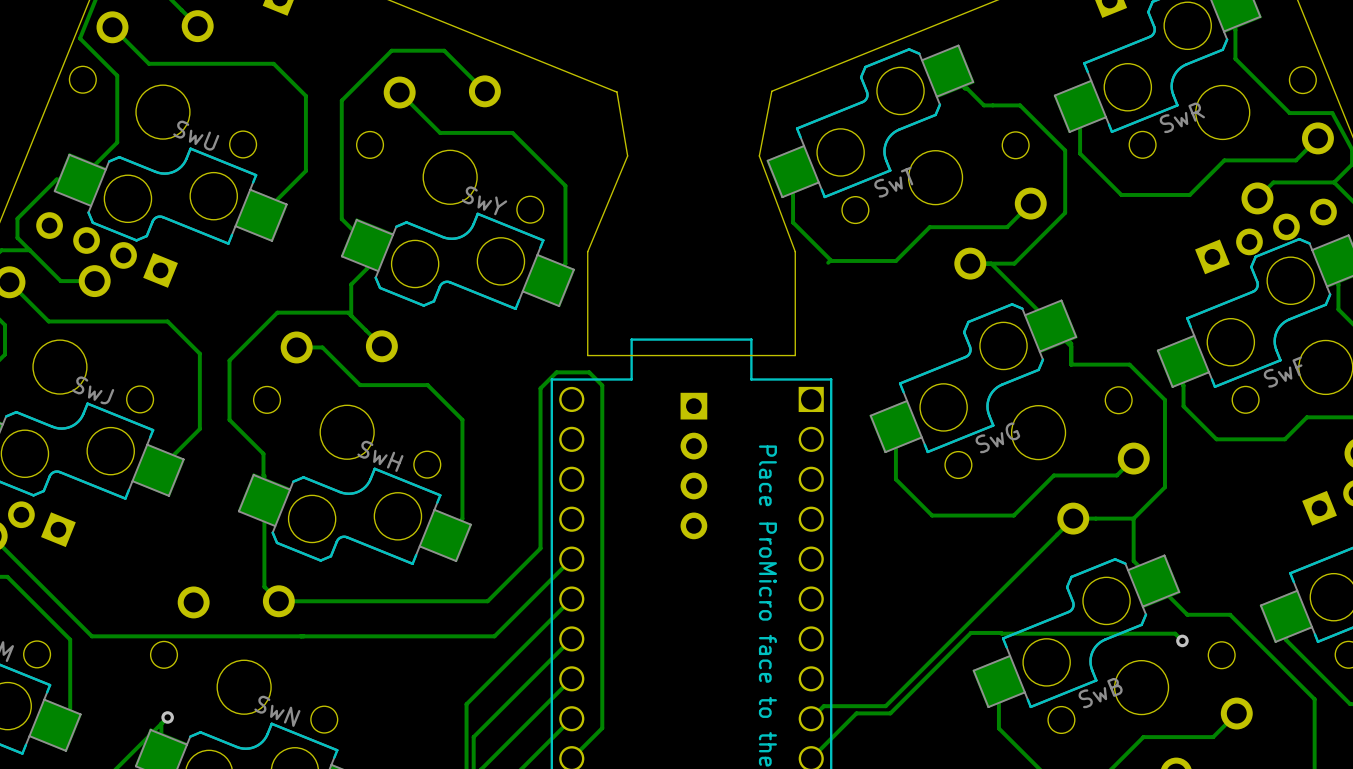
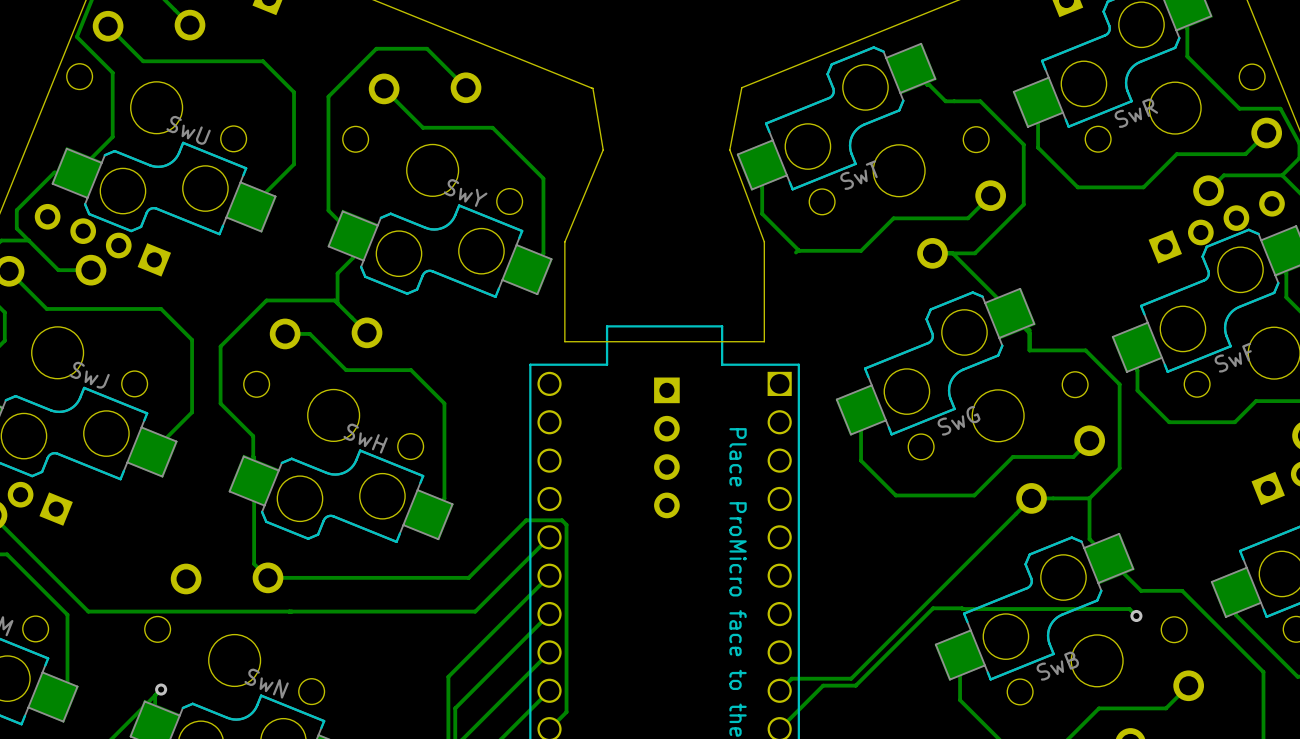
track: (540, 548) (540, 388) (556, 372) (589, 372) (602, 385) (602, 728) (589, 740) -> (519, 527) (526, 520) (562, 520) (566, 524) (566, 712)

